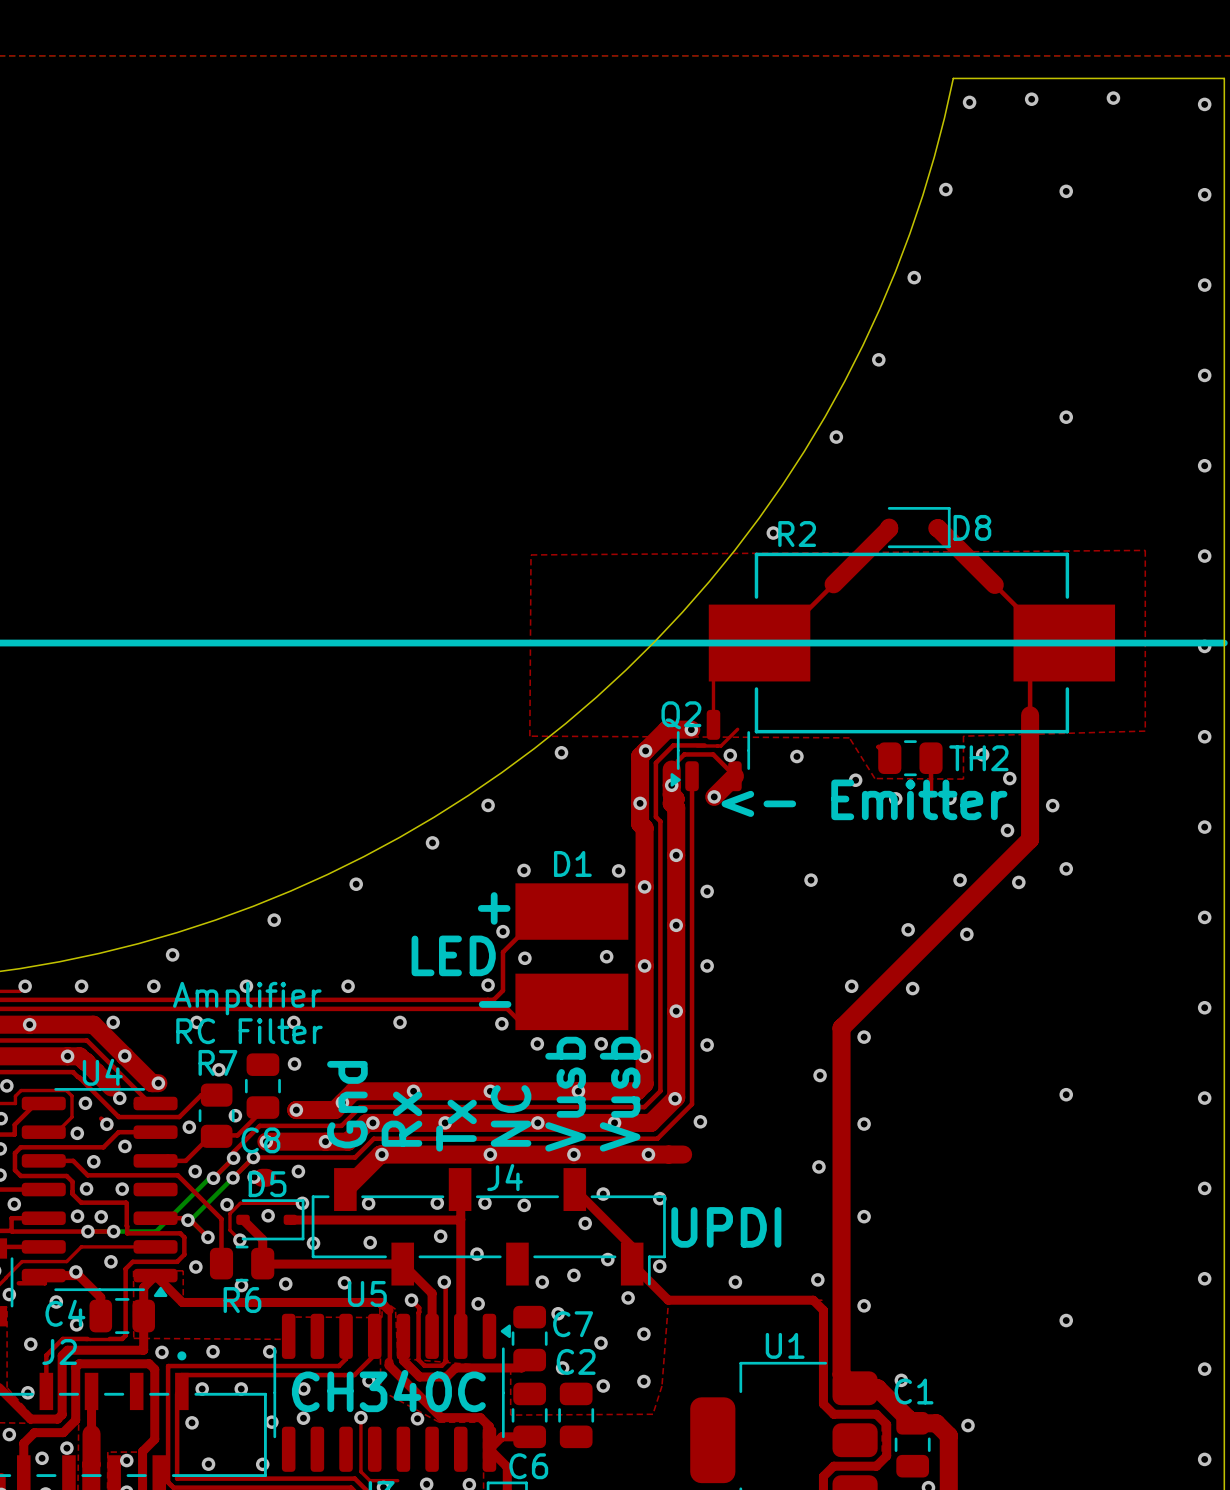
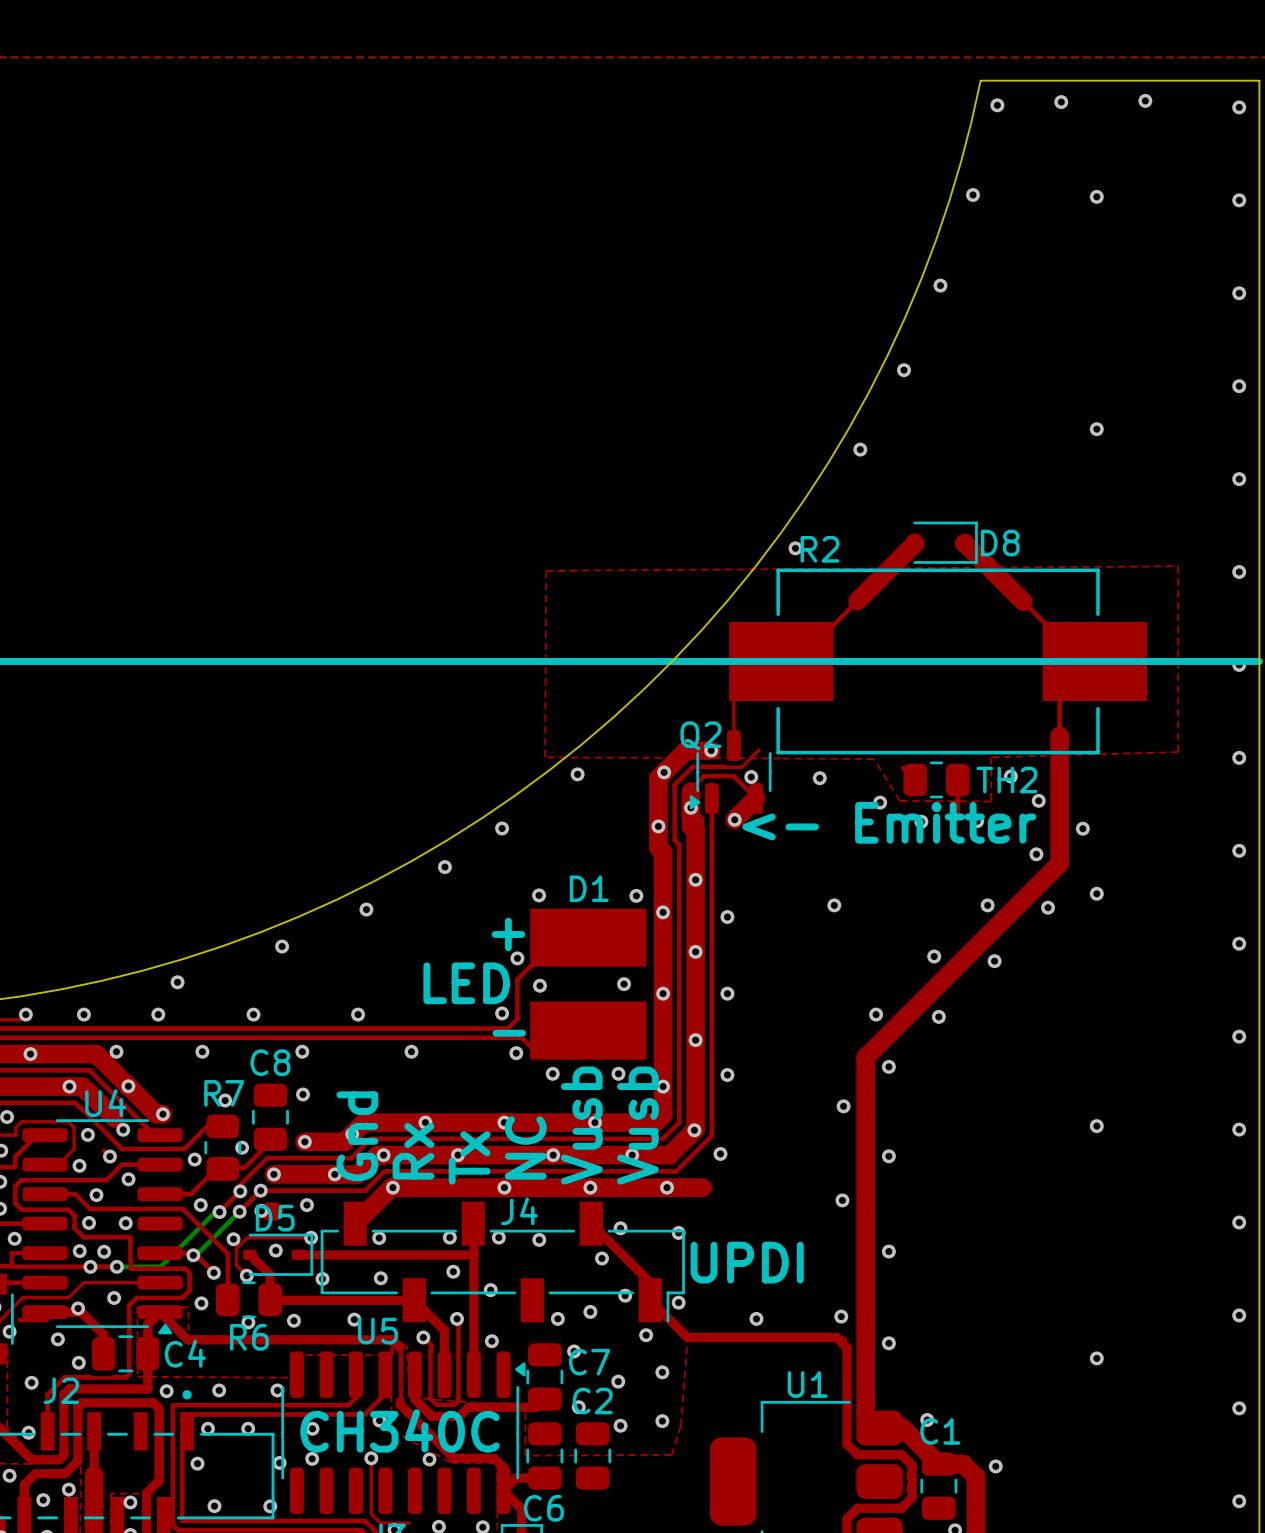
text: Amplifier (247, 998) -> none
text: RC Filter (249, 1031) -> none
C8 name position: C8 (260, 1140) -> C8 (270, 1062)
C4 name position: C4 (65, 1313) -> C4 (185, 1353)

